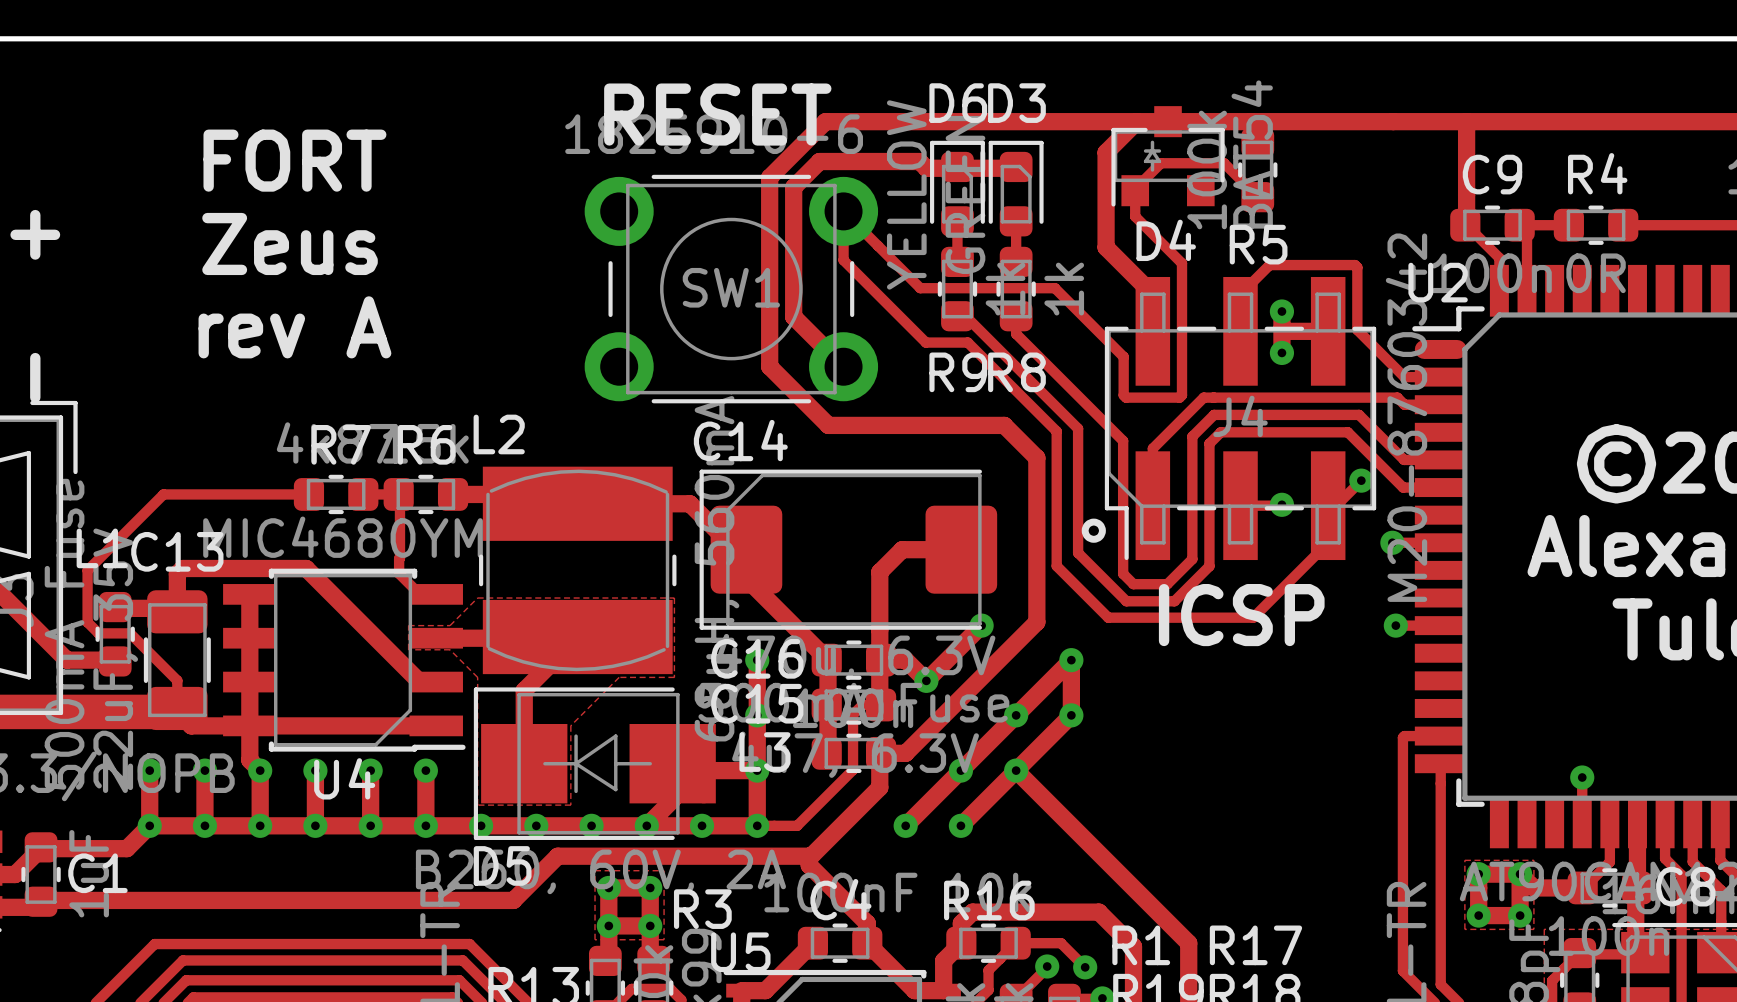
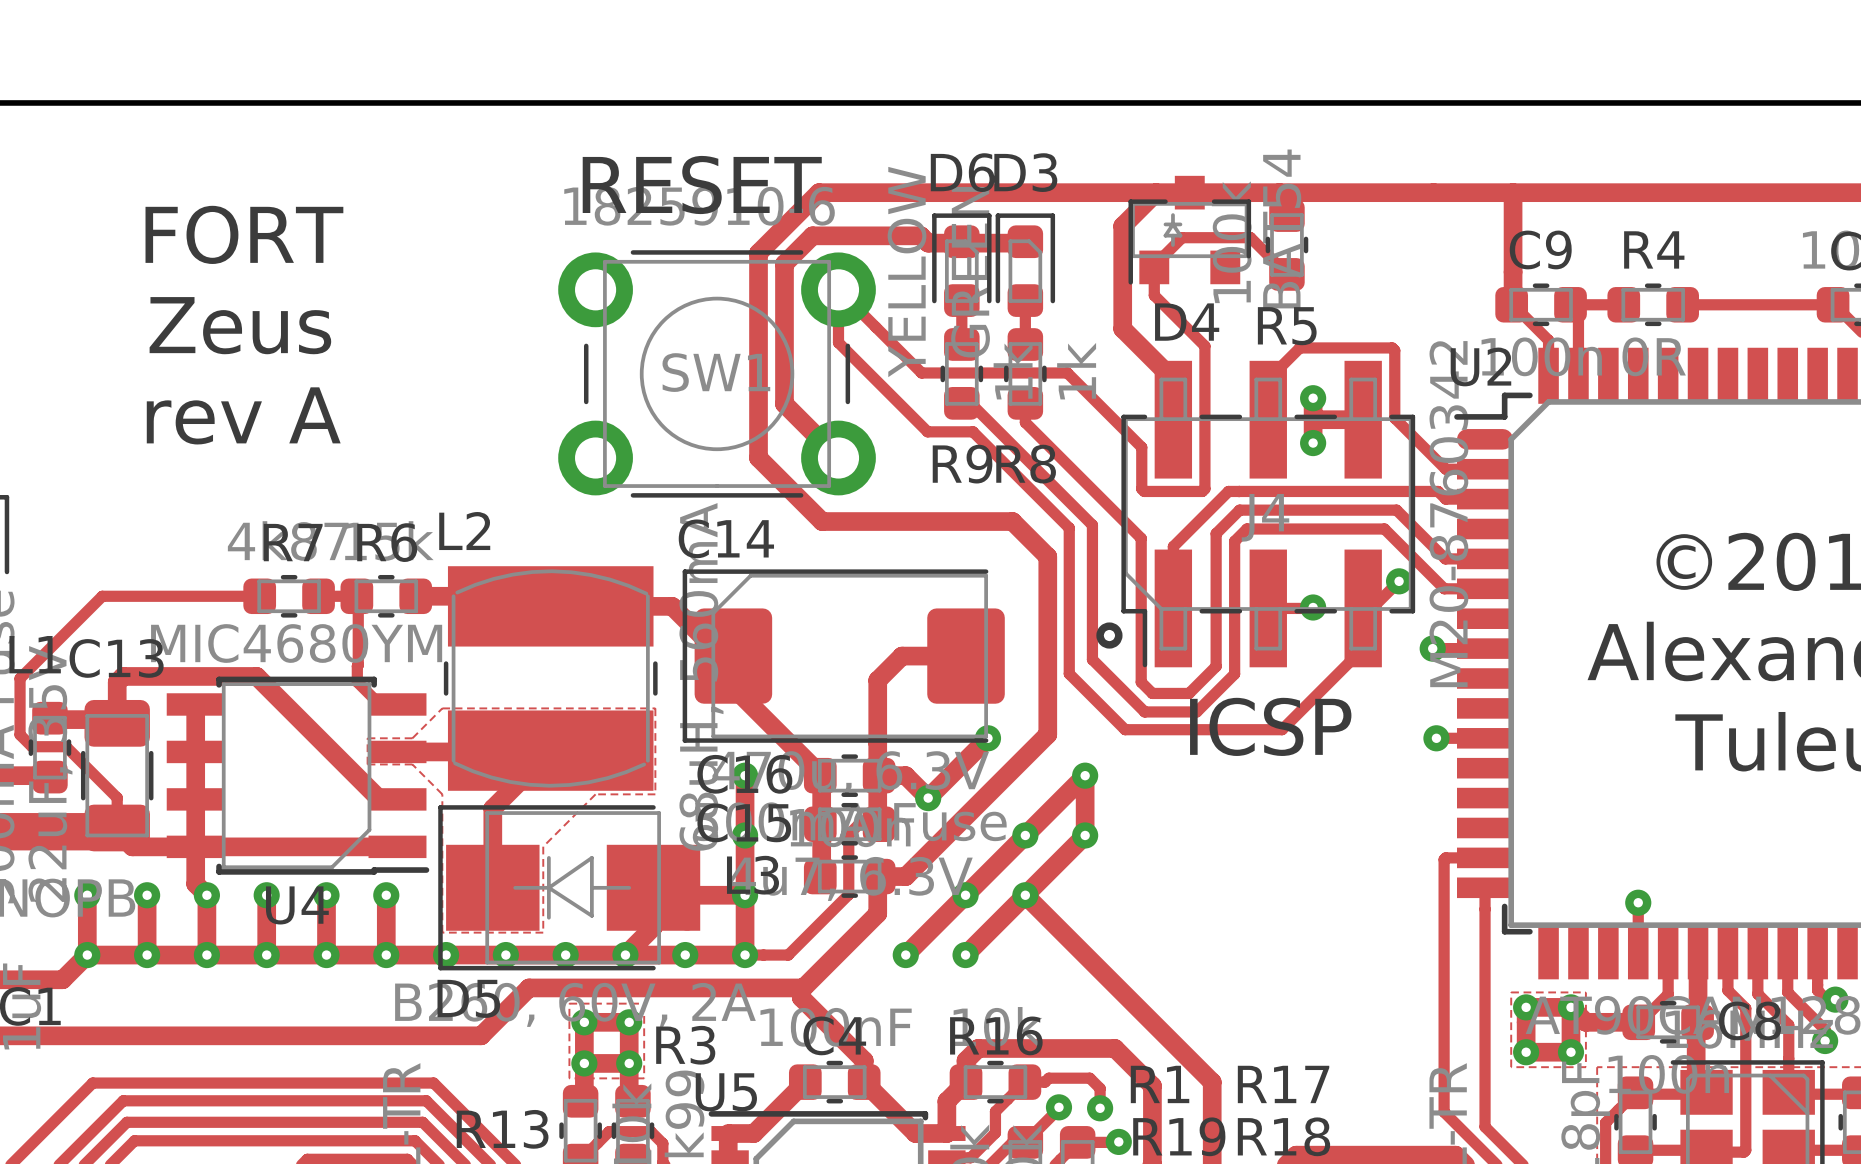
track: (1034, 943) (1061, 943) (1085, 967) -> (1044, 1082) (1048, 1078) (1089, 1078) (1100, 1088) (1100, 1108)

